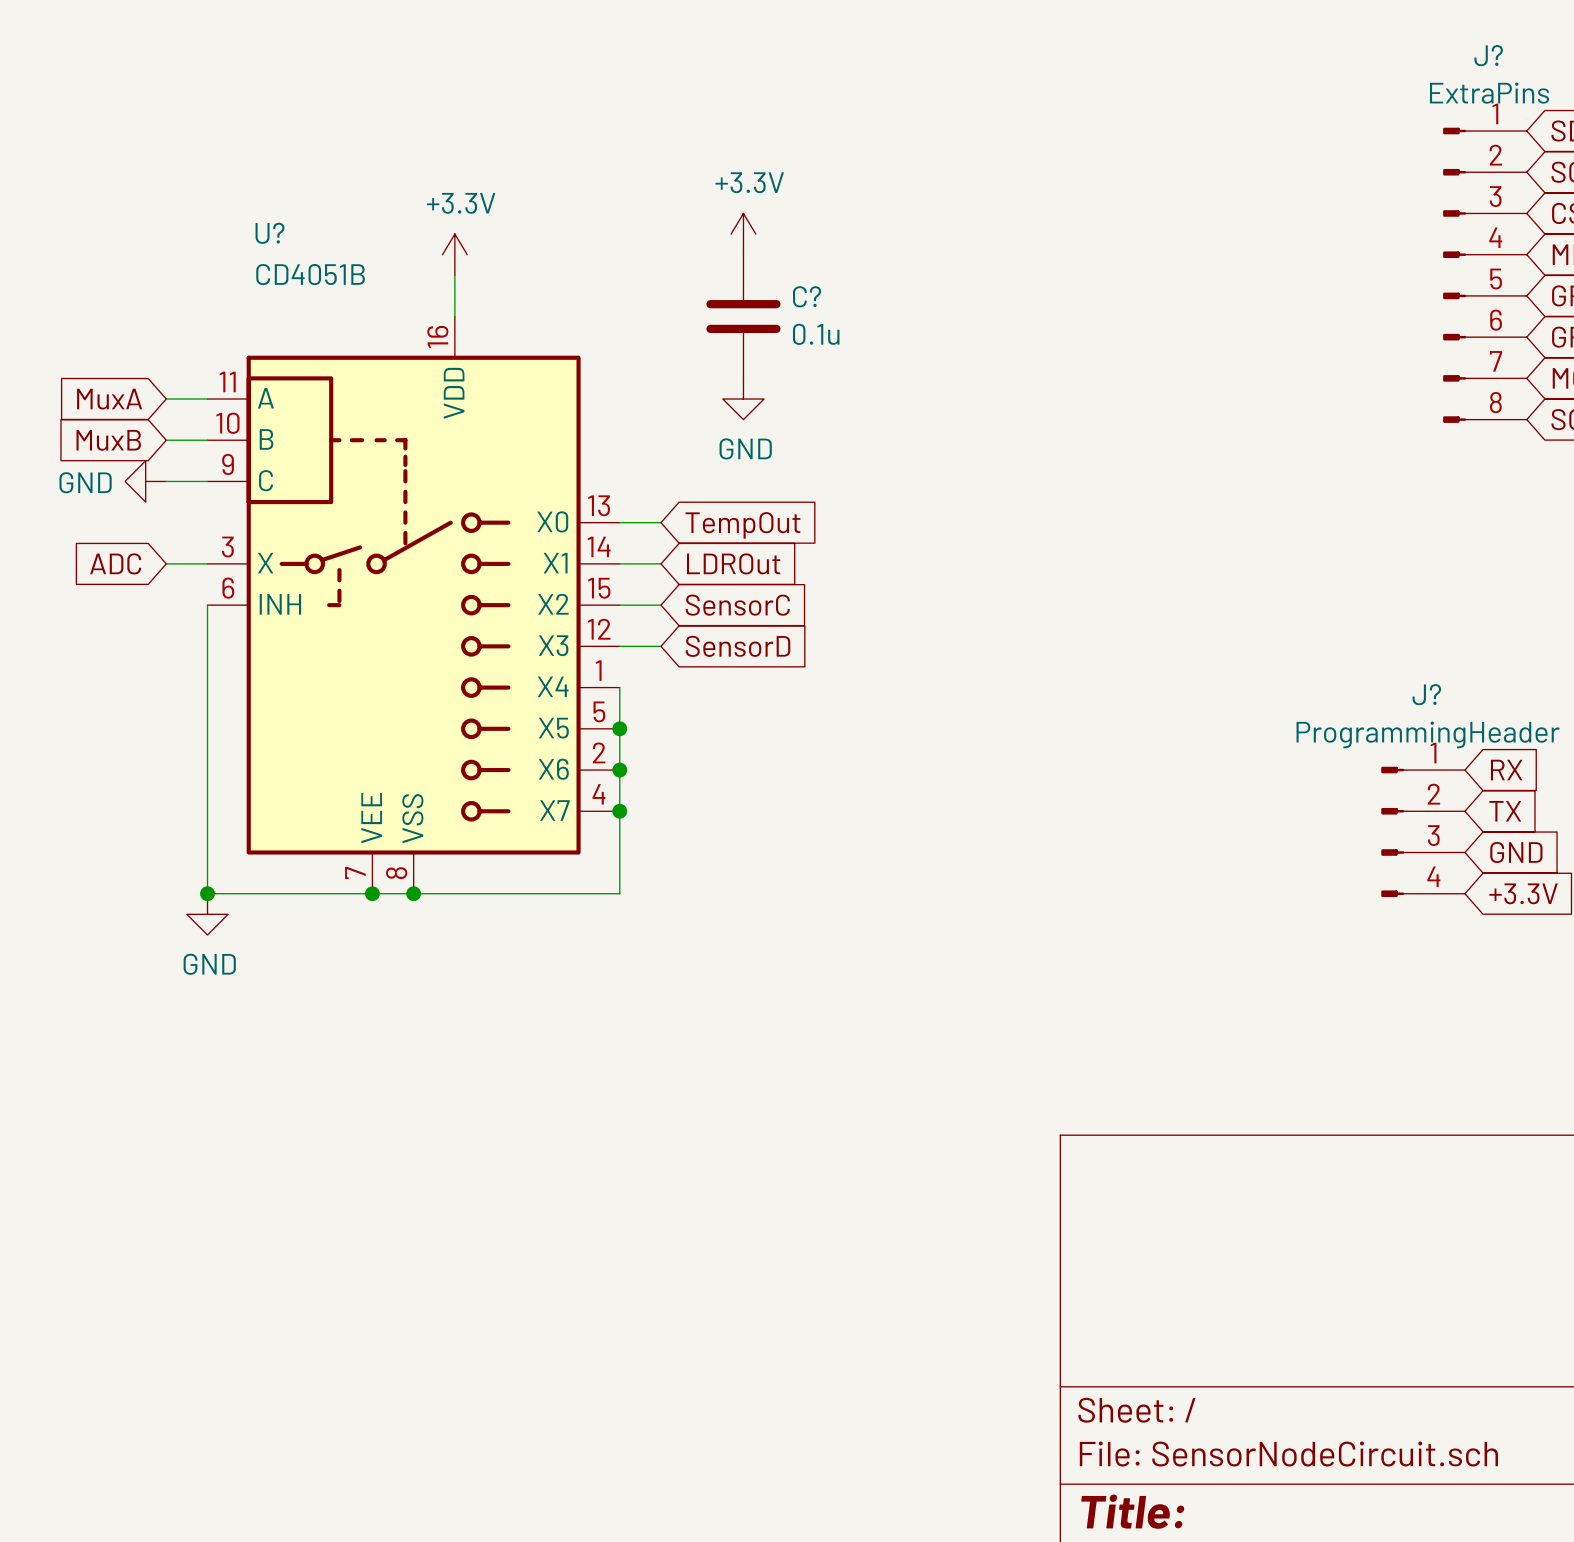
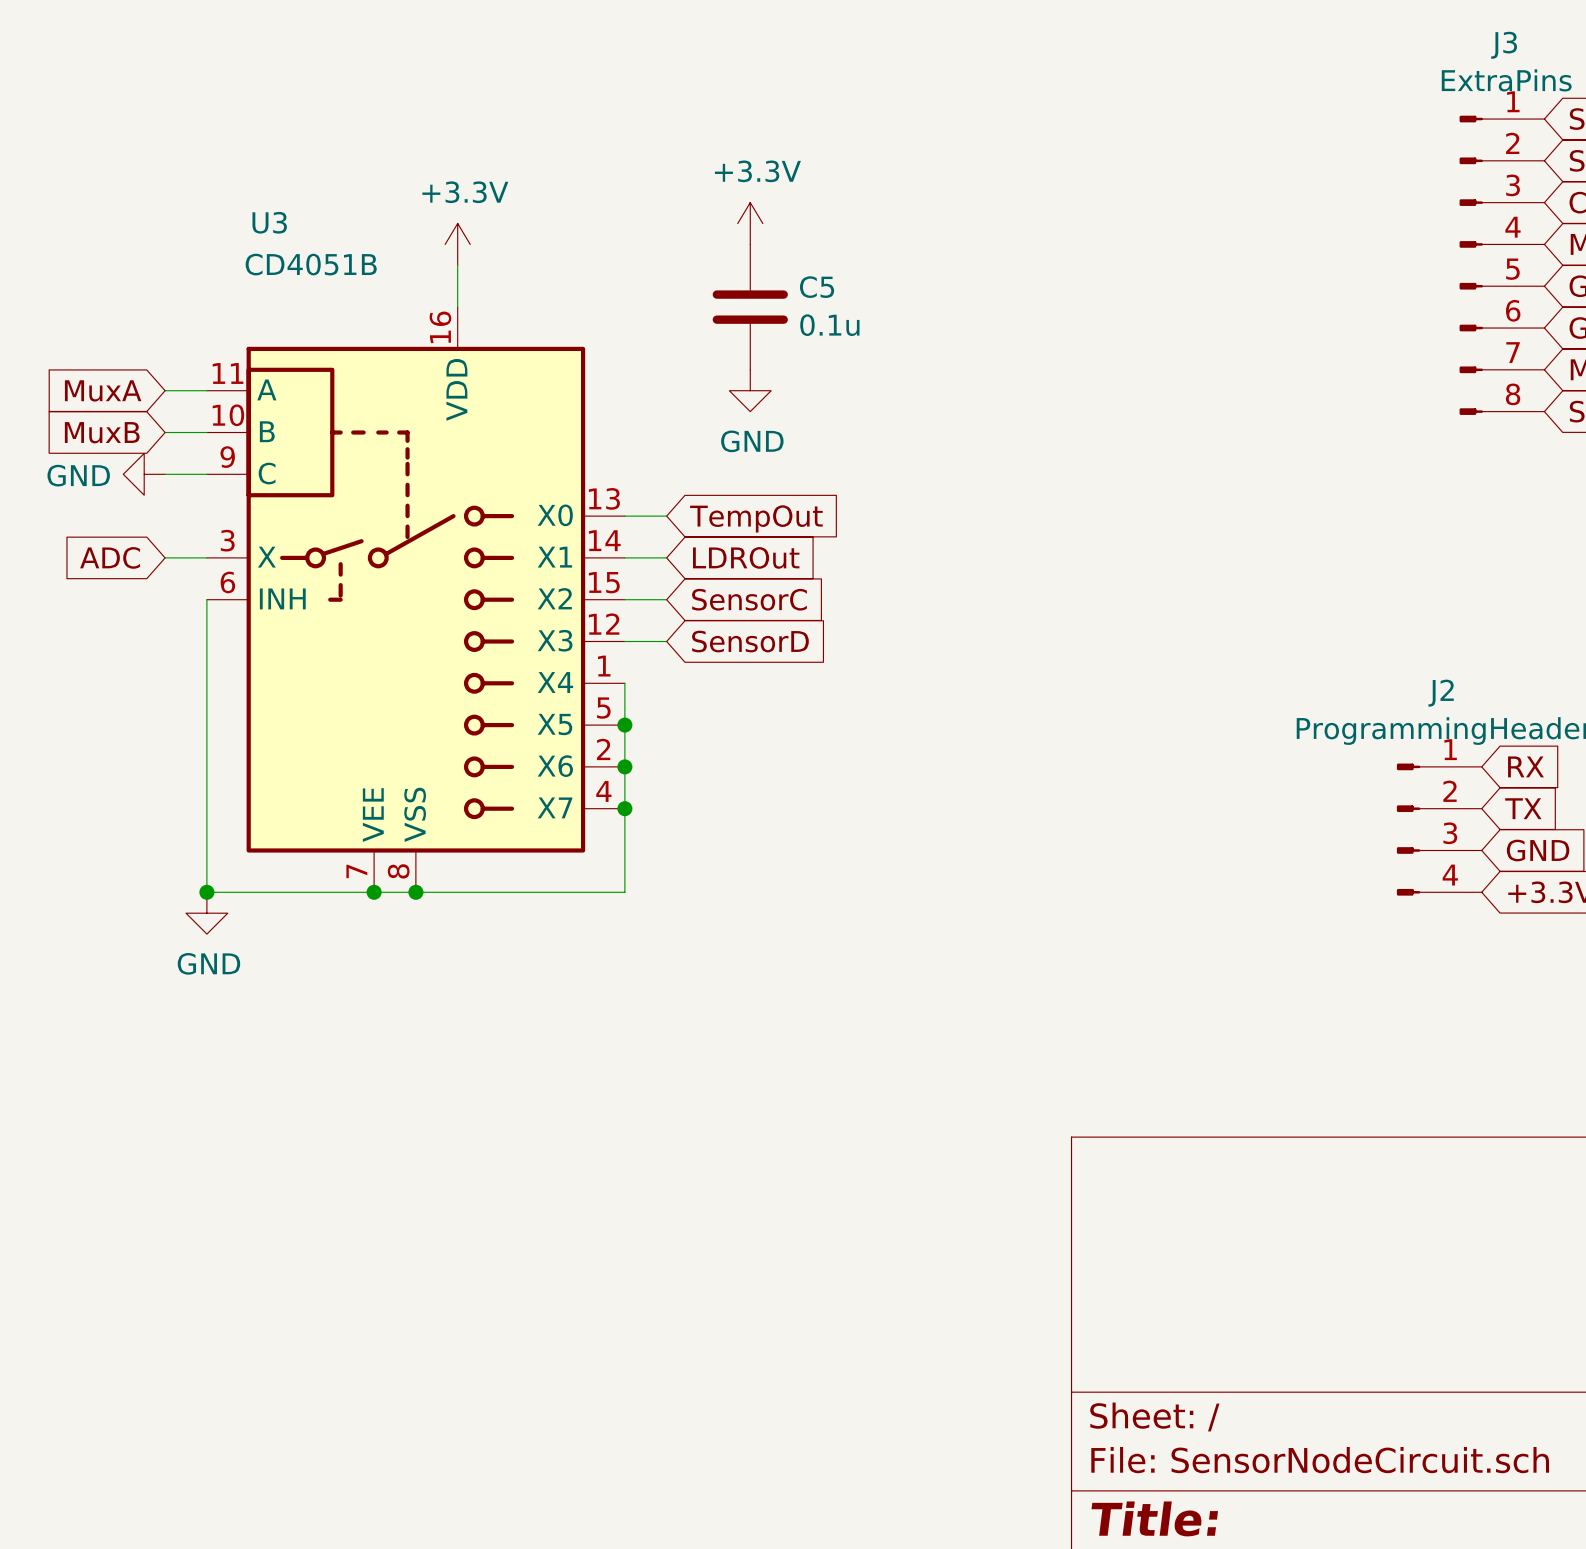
J? name: J? (1488, 55) -> J3 (1504, 45)
U? name: U? (269, 233) -> U3 (269, 222)
C? name: C? (807, 296) -> C5 (817, 287)
J? name: J? (1426, 694) -> J2 (1441, 693)

